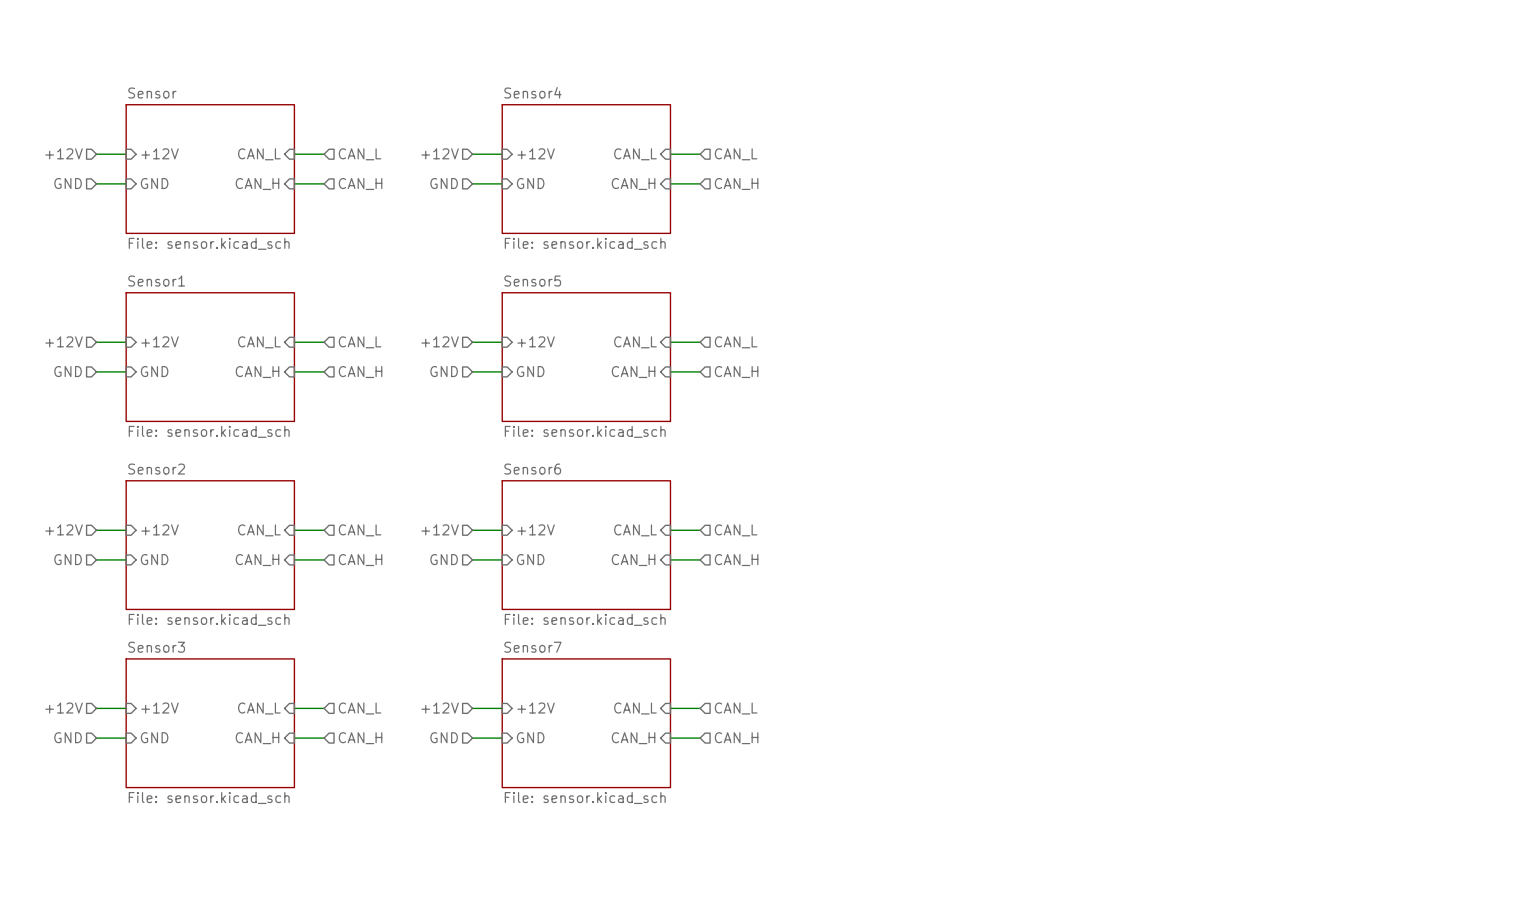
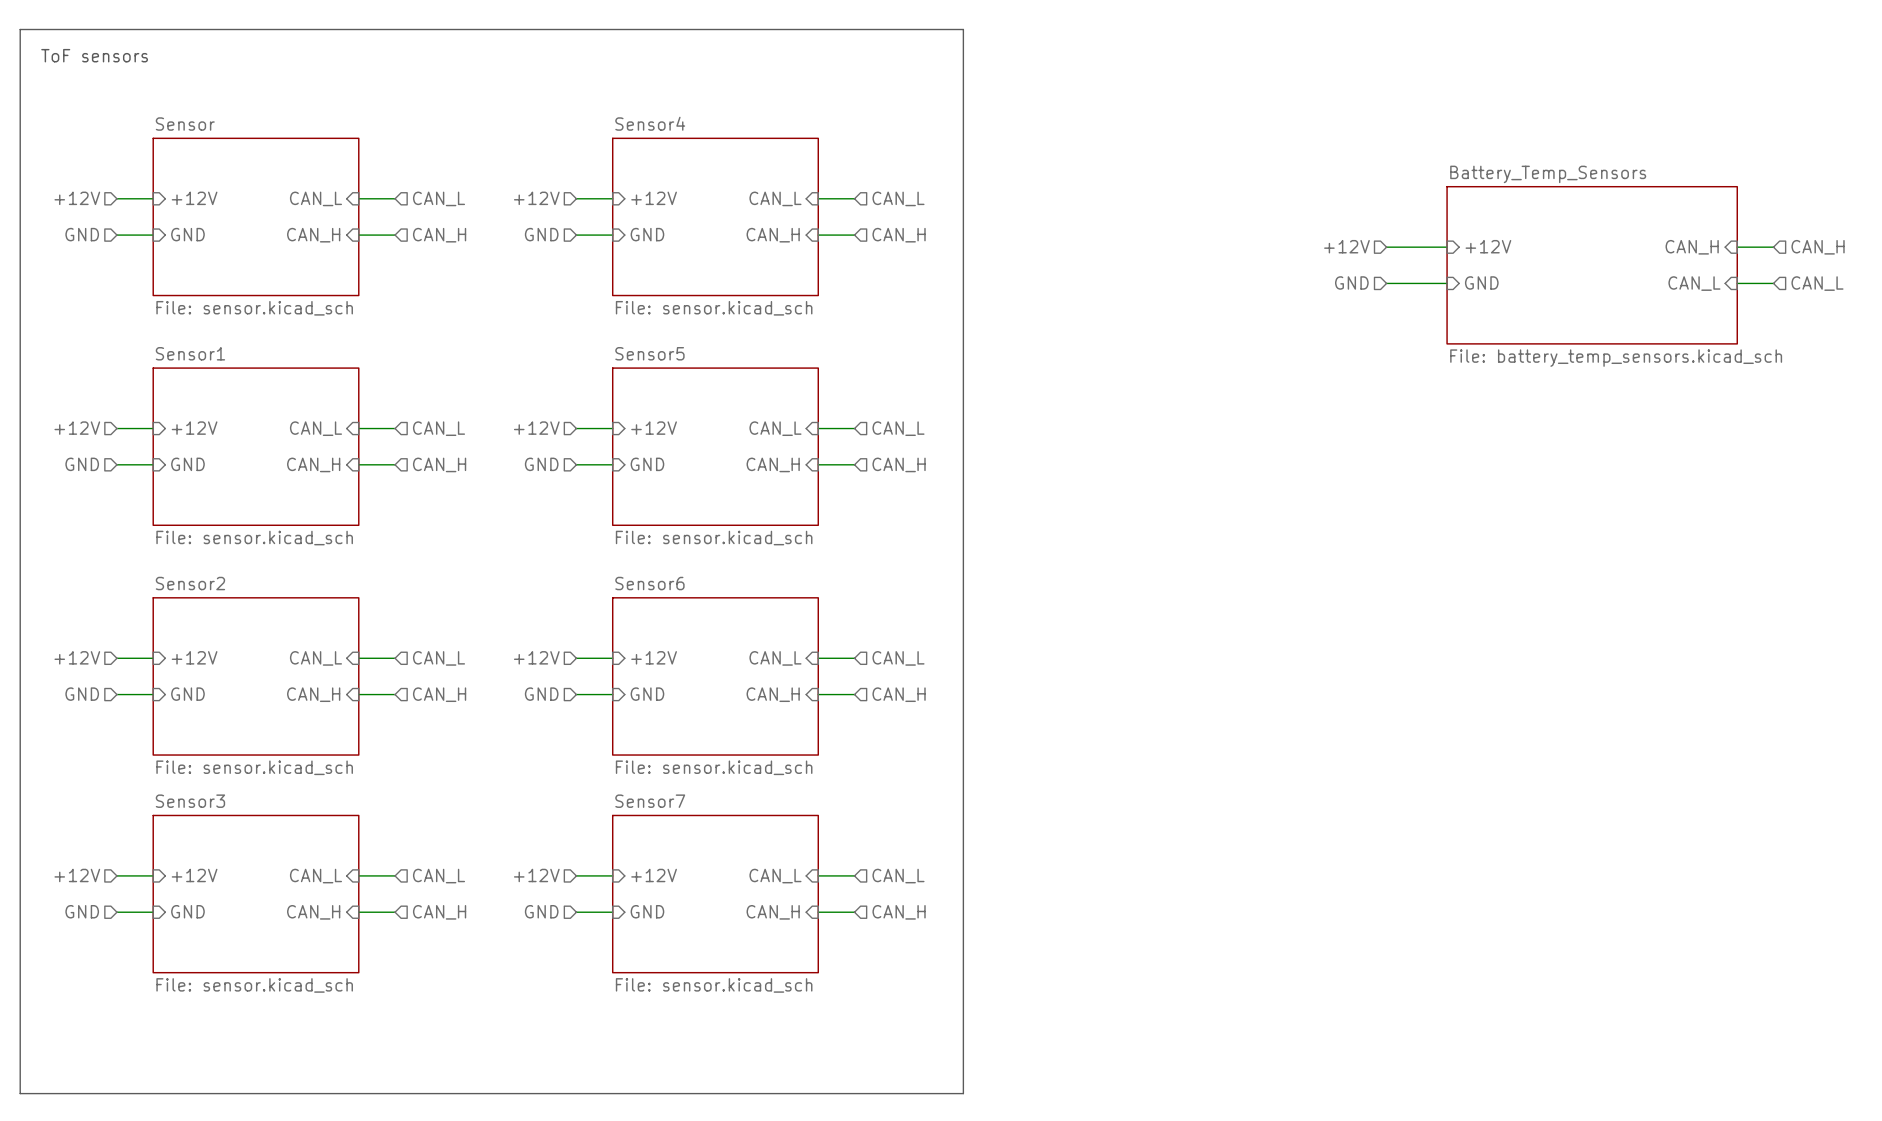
line: none -> (20, 29) (963, 29) (963, 1093) (20, 1093) (20, 29)
text: none -> ToF sensors (94, 55)
hierarchical label: none -> +12V (1346, 246)
wire: none -> (1386, 247) (1447, 247)
sheet pin: none -> +12V (1488, 246)
sheet pin: none -> CAN_H (1692, 247)
wire: none -> (1737, 247) (1773, 247)
hierarchical label: none -> CAN_H (1818, 247)
sheet Battery_Temp_Sensors: none -> File: battery_temp_sensors.kicad_sch (1592, 265)
hierarchical label: none -> GND (1351, 282)
wire: none -> (1386, 283) (1447, 283)
sheet pin: none -> GND (1481, 282)
sheet pin: none -> CAN_L (1694, 283)
wire: none -> (1737, 283) (1773, 283)
hierarchical label: none -> CAN_L (1817, 283)

